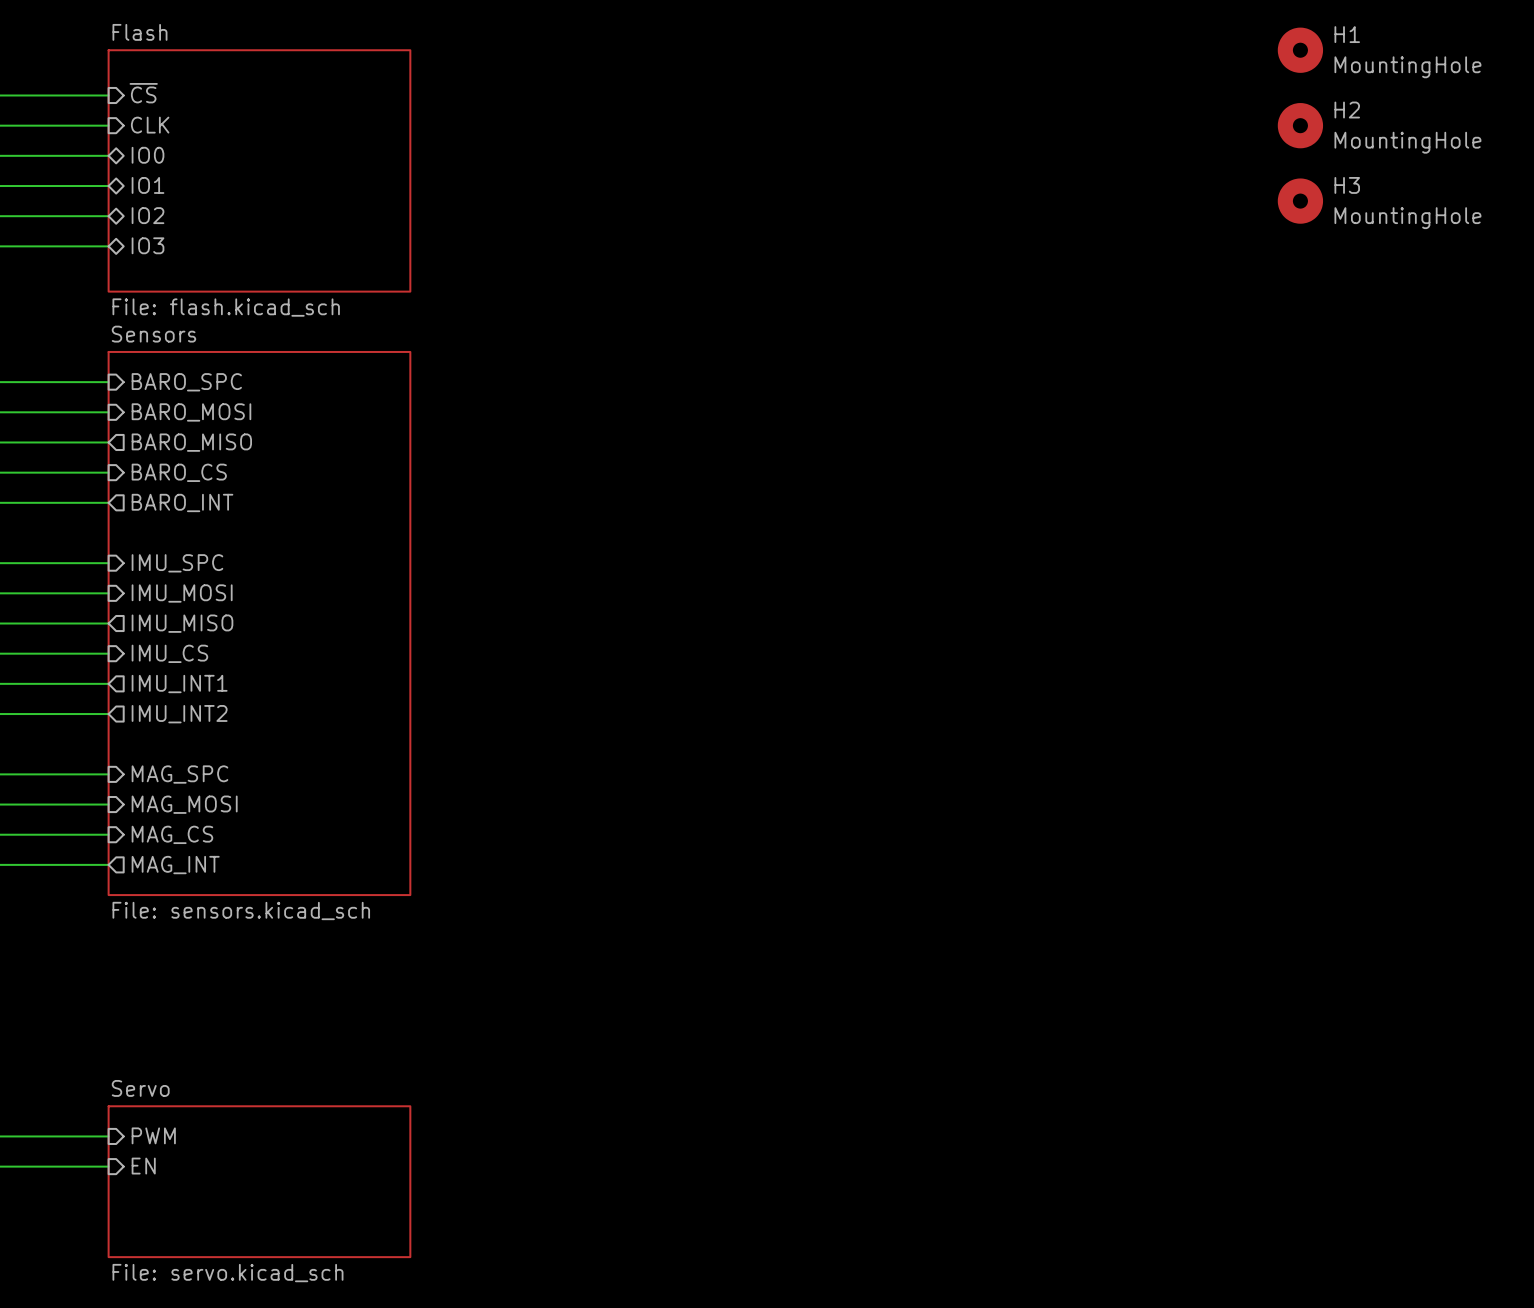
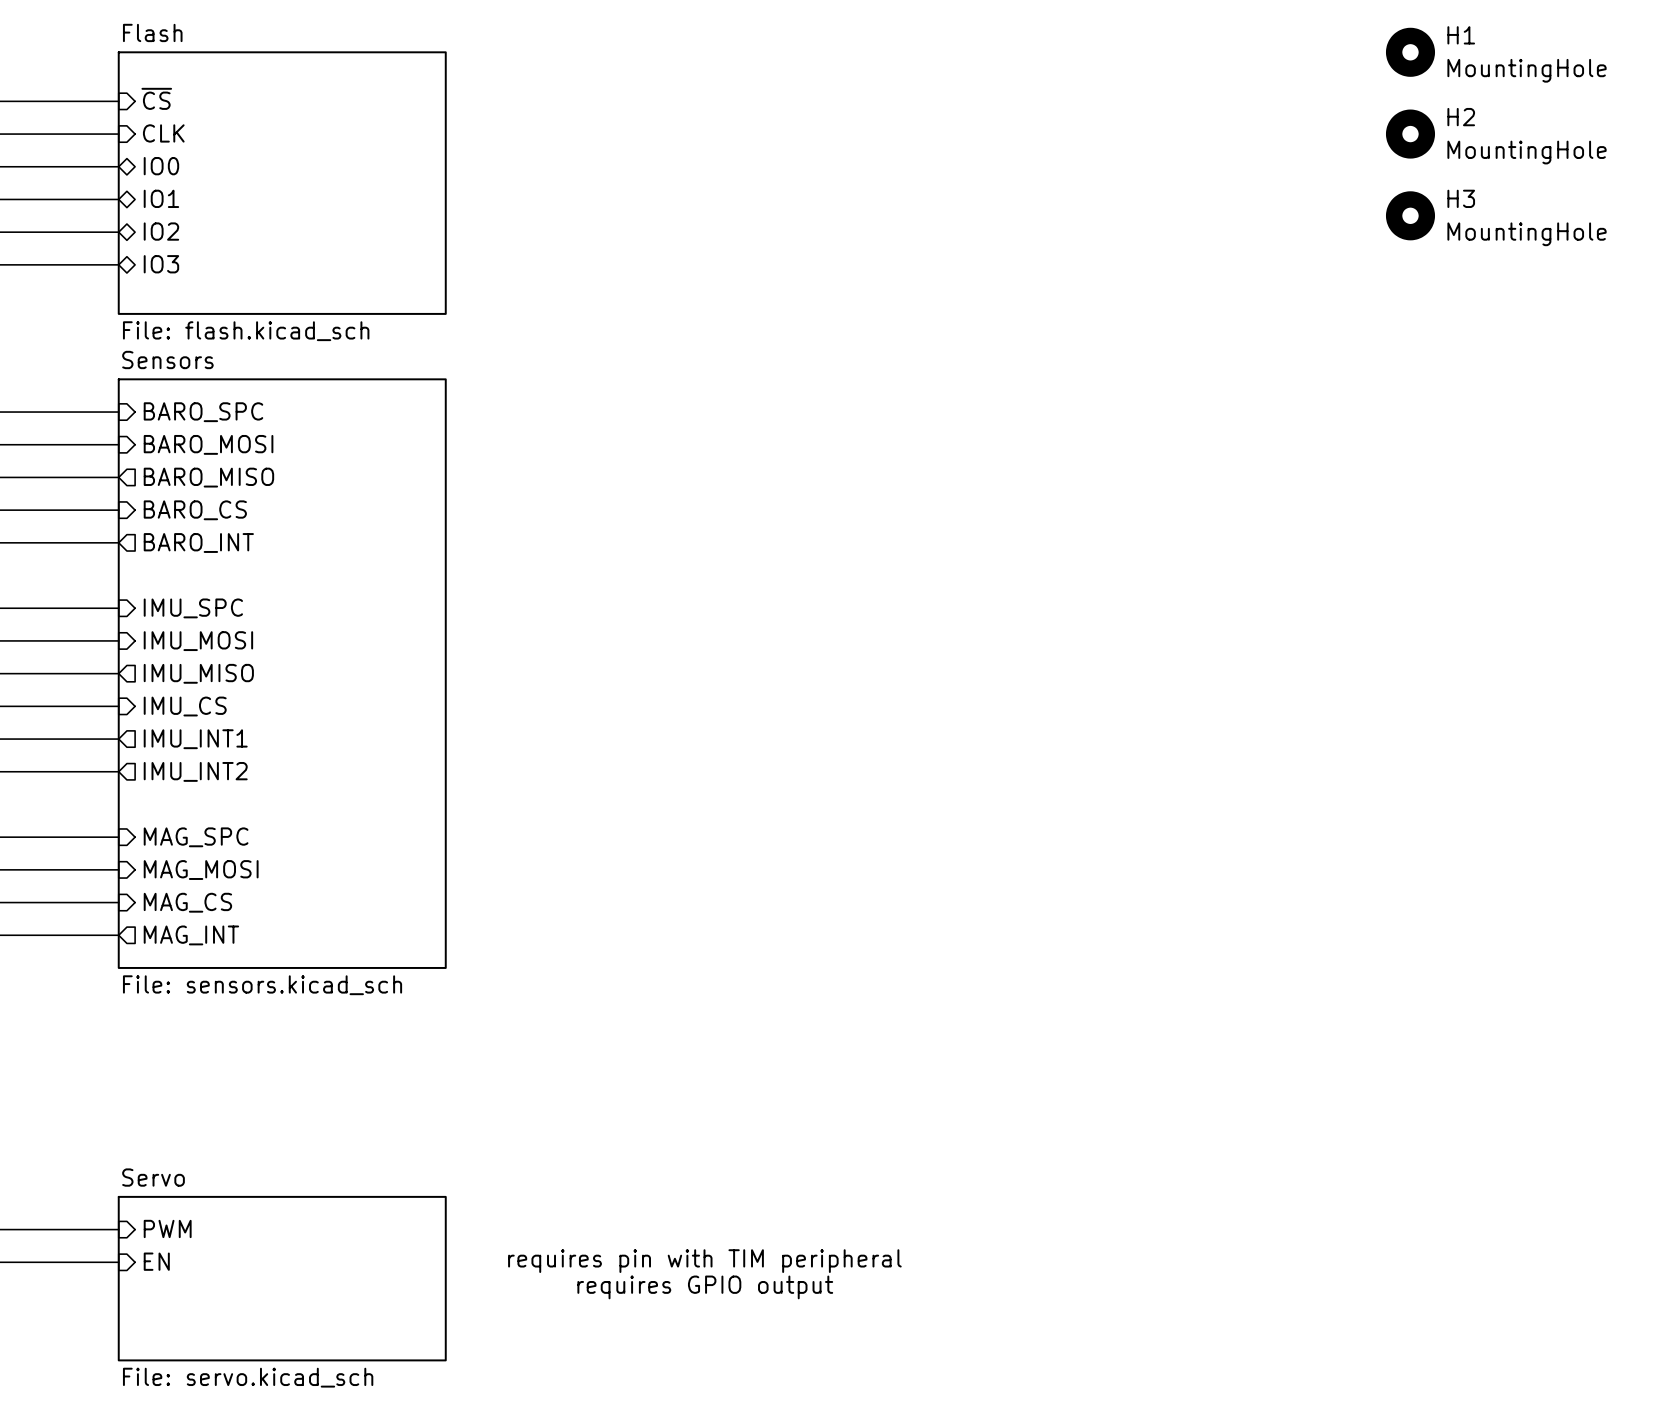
text: none -> requires pin with TIM peripheral (704, 1261)
text: none -> requires GPIO output (705, 1287)

